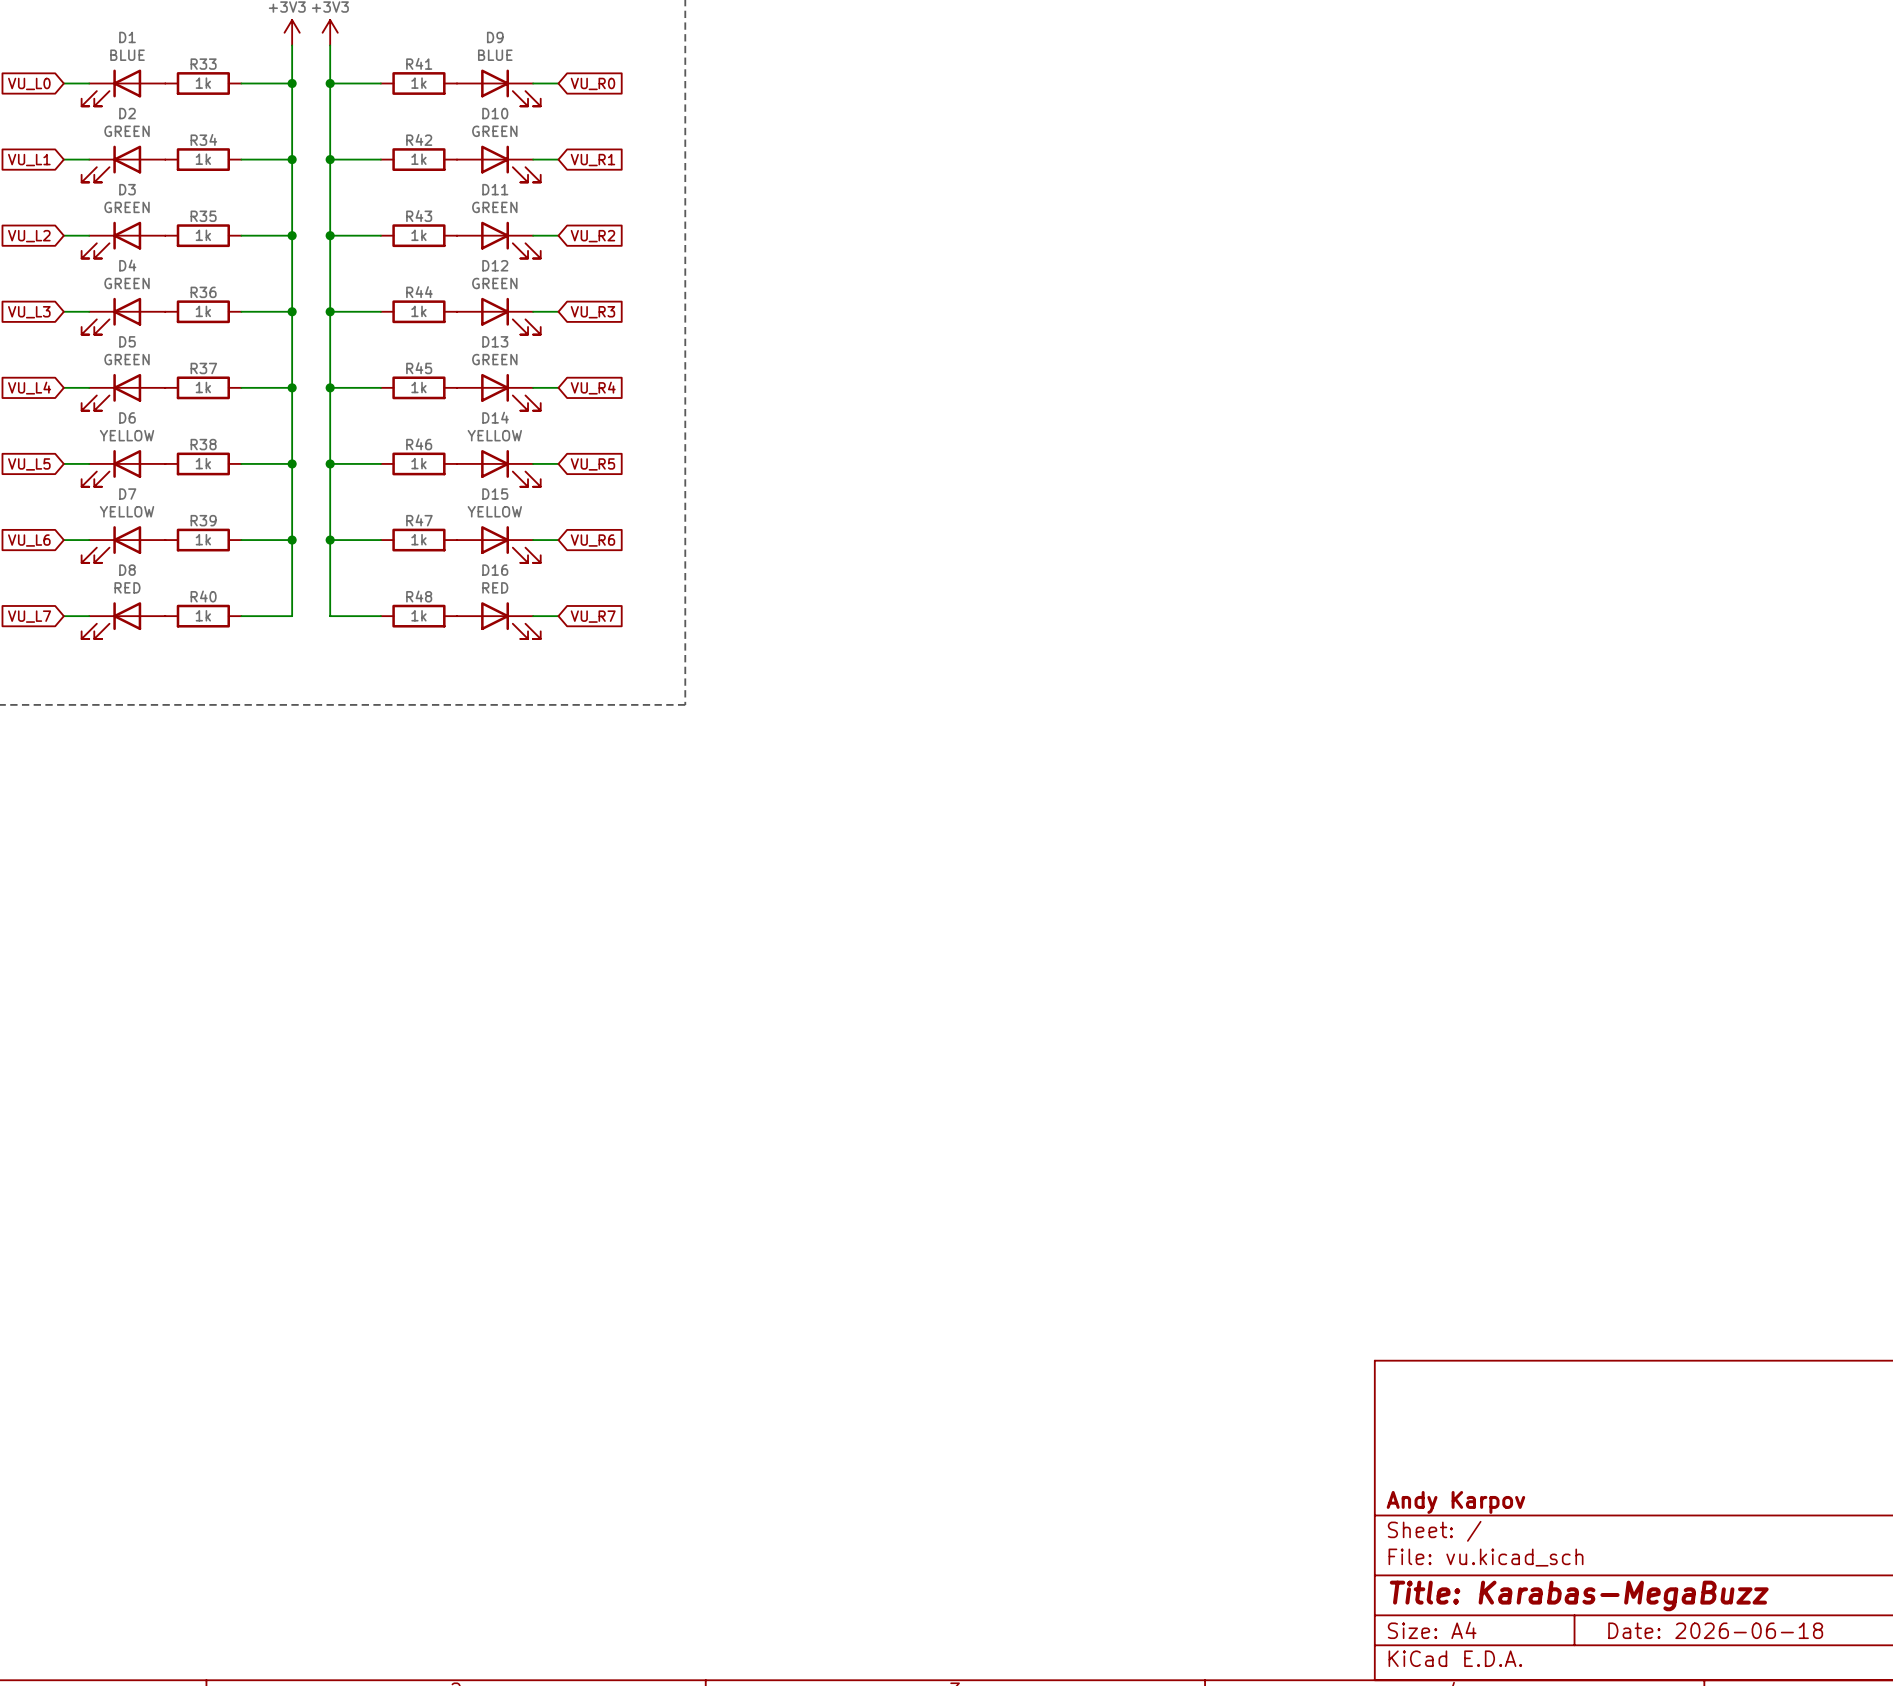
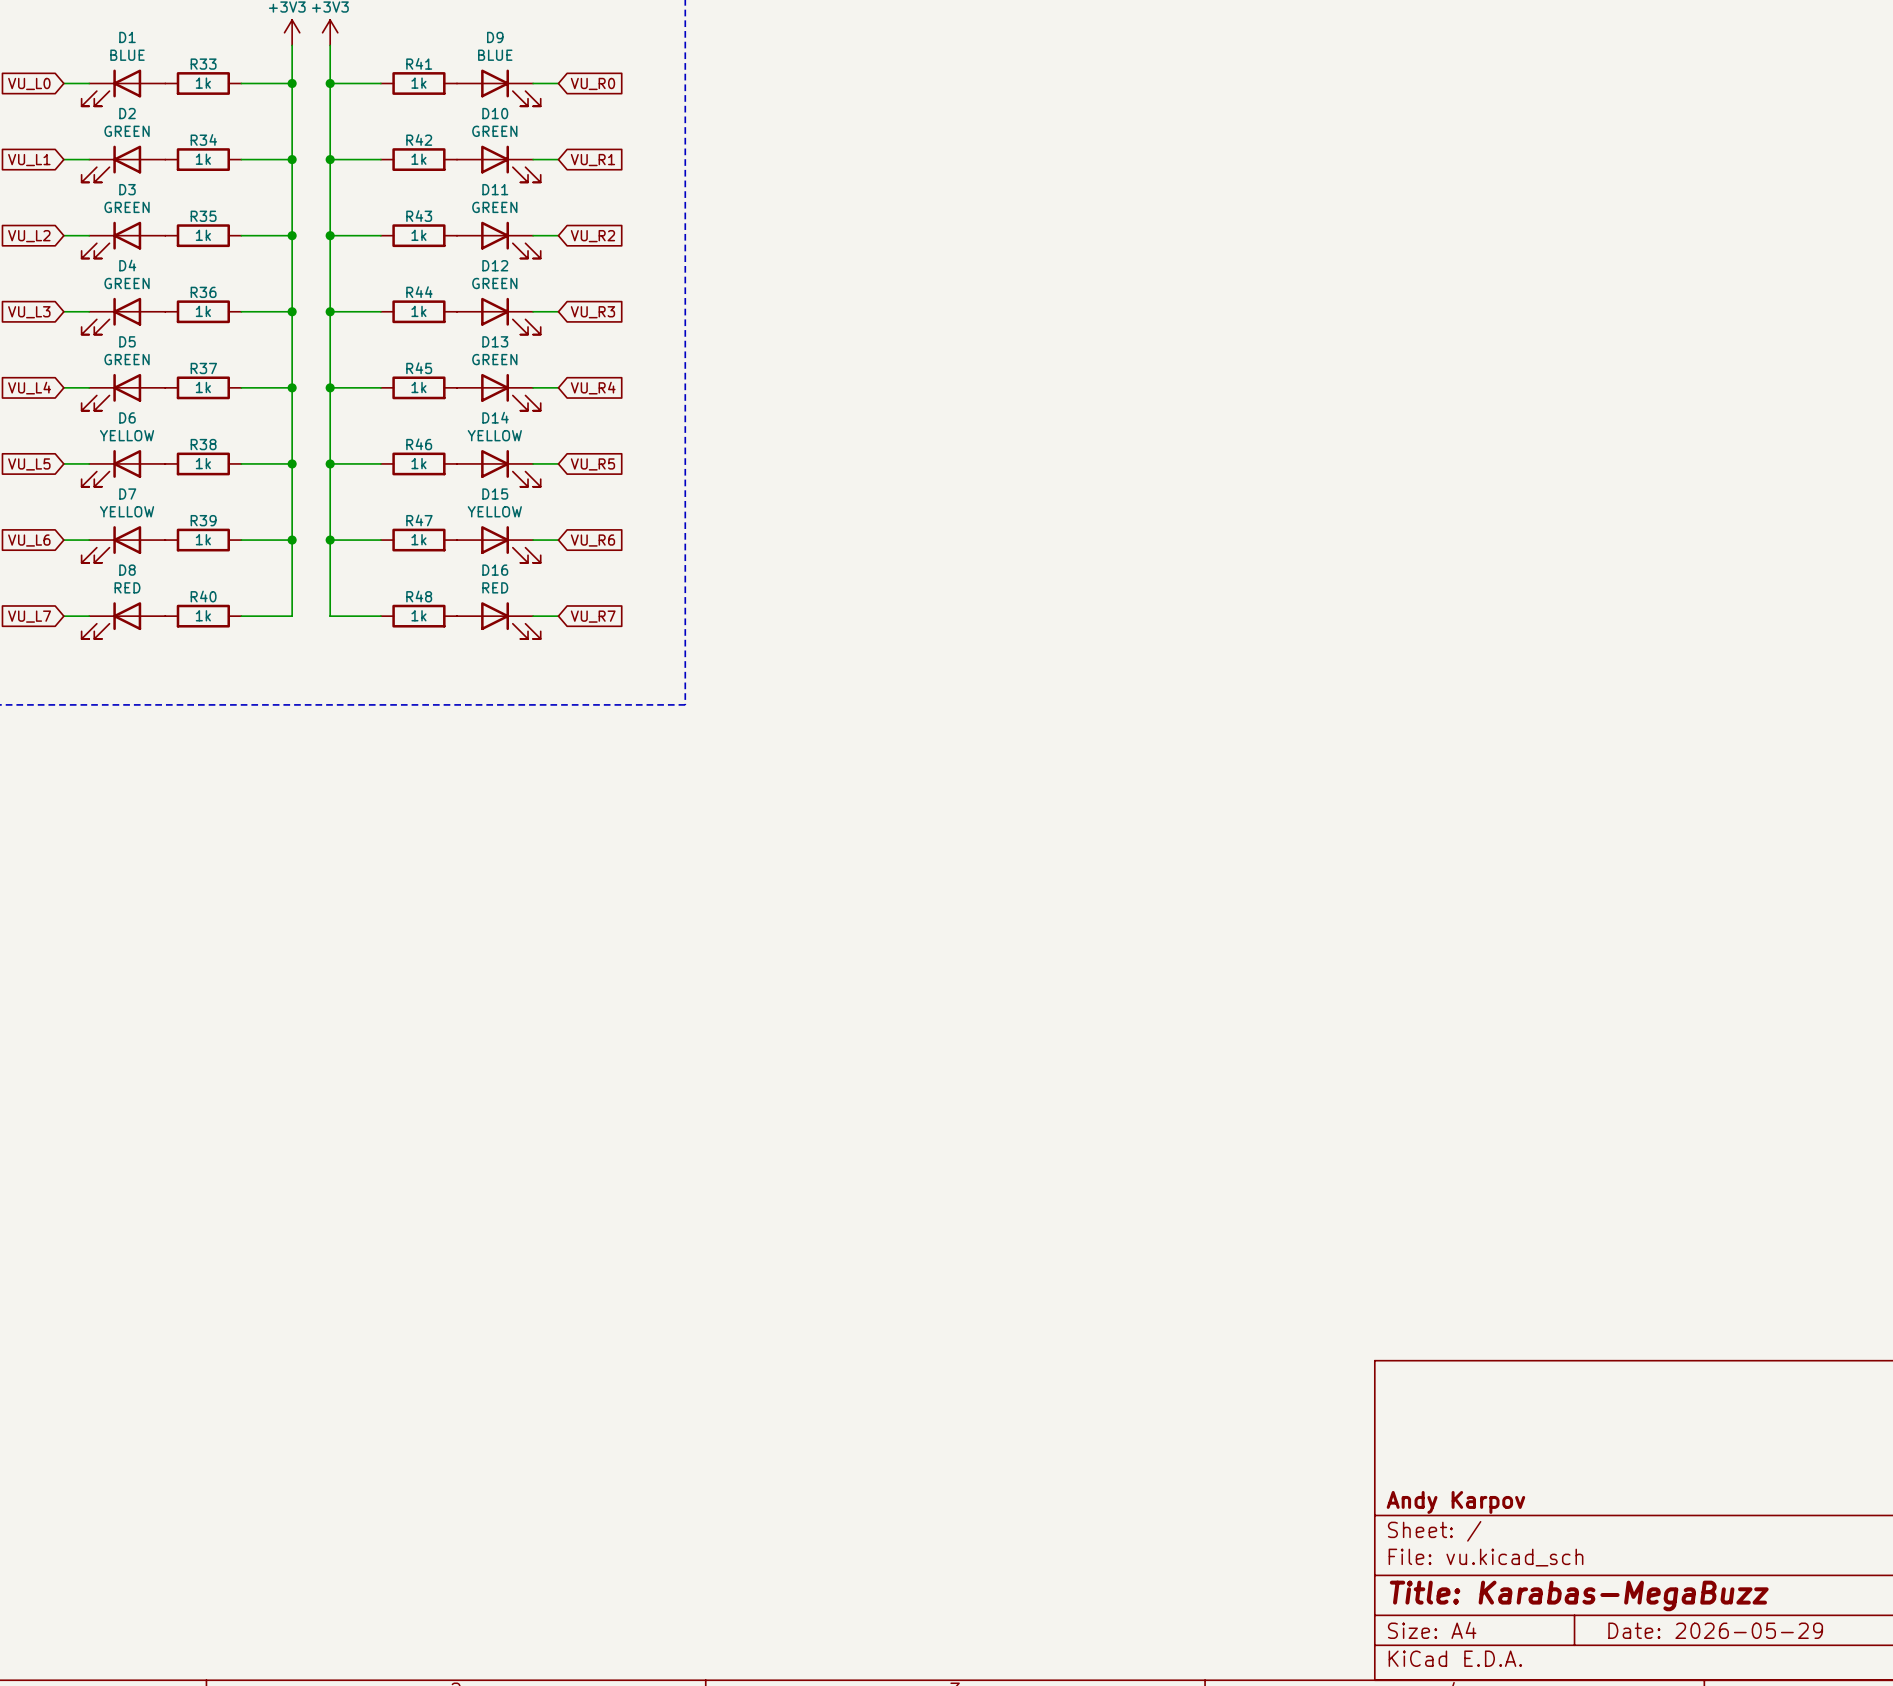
title block: Date: 2026-06-18 (1715, 1630) -> Date: 2026-05-29 (1715, 1630)

